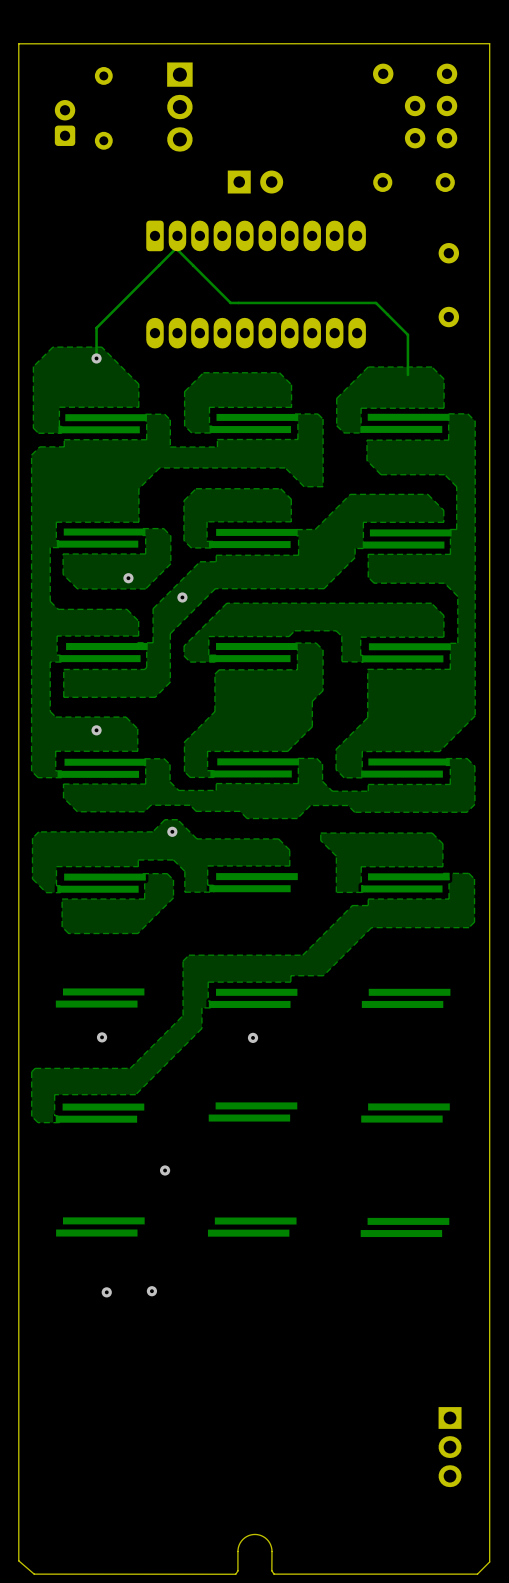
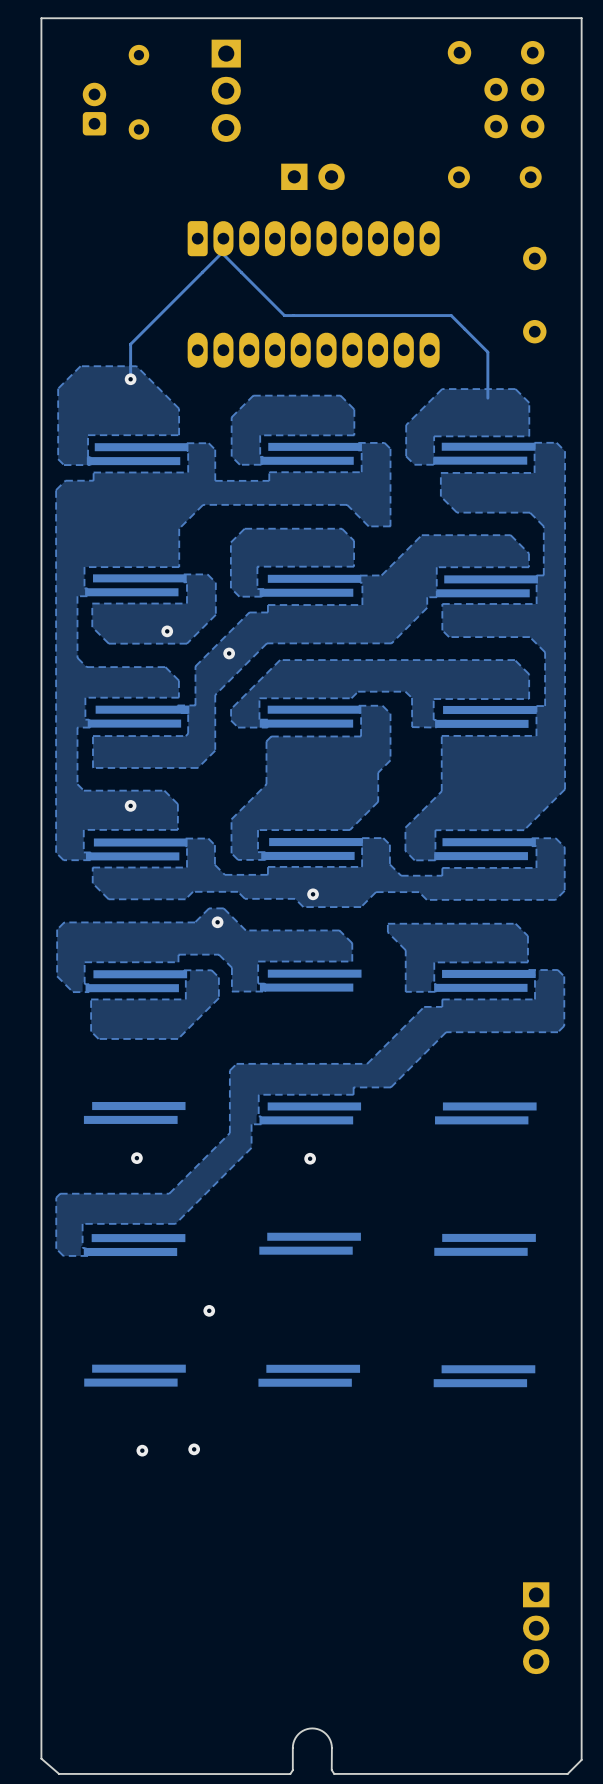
via: none -> (313, 894)

